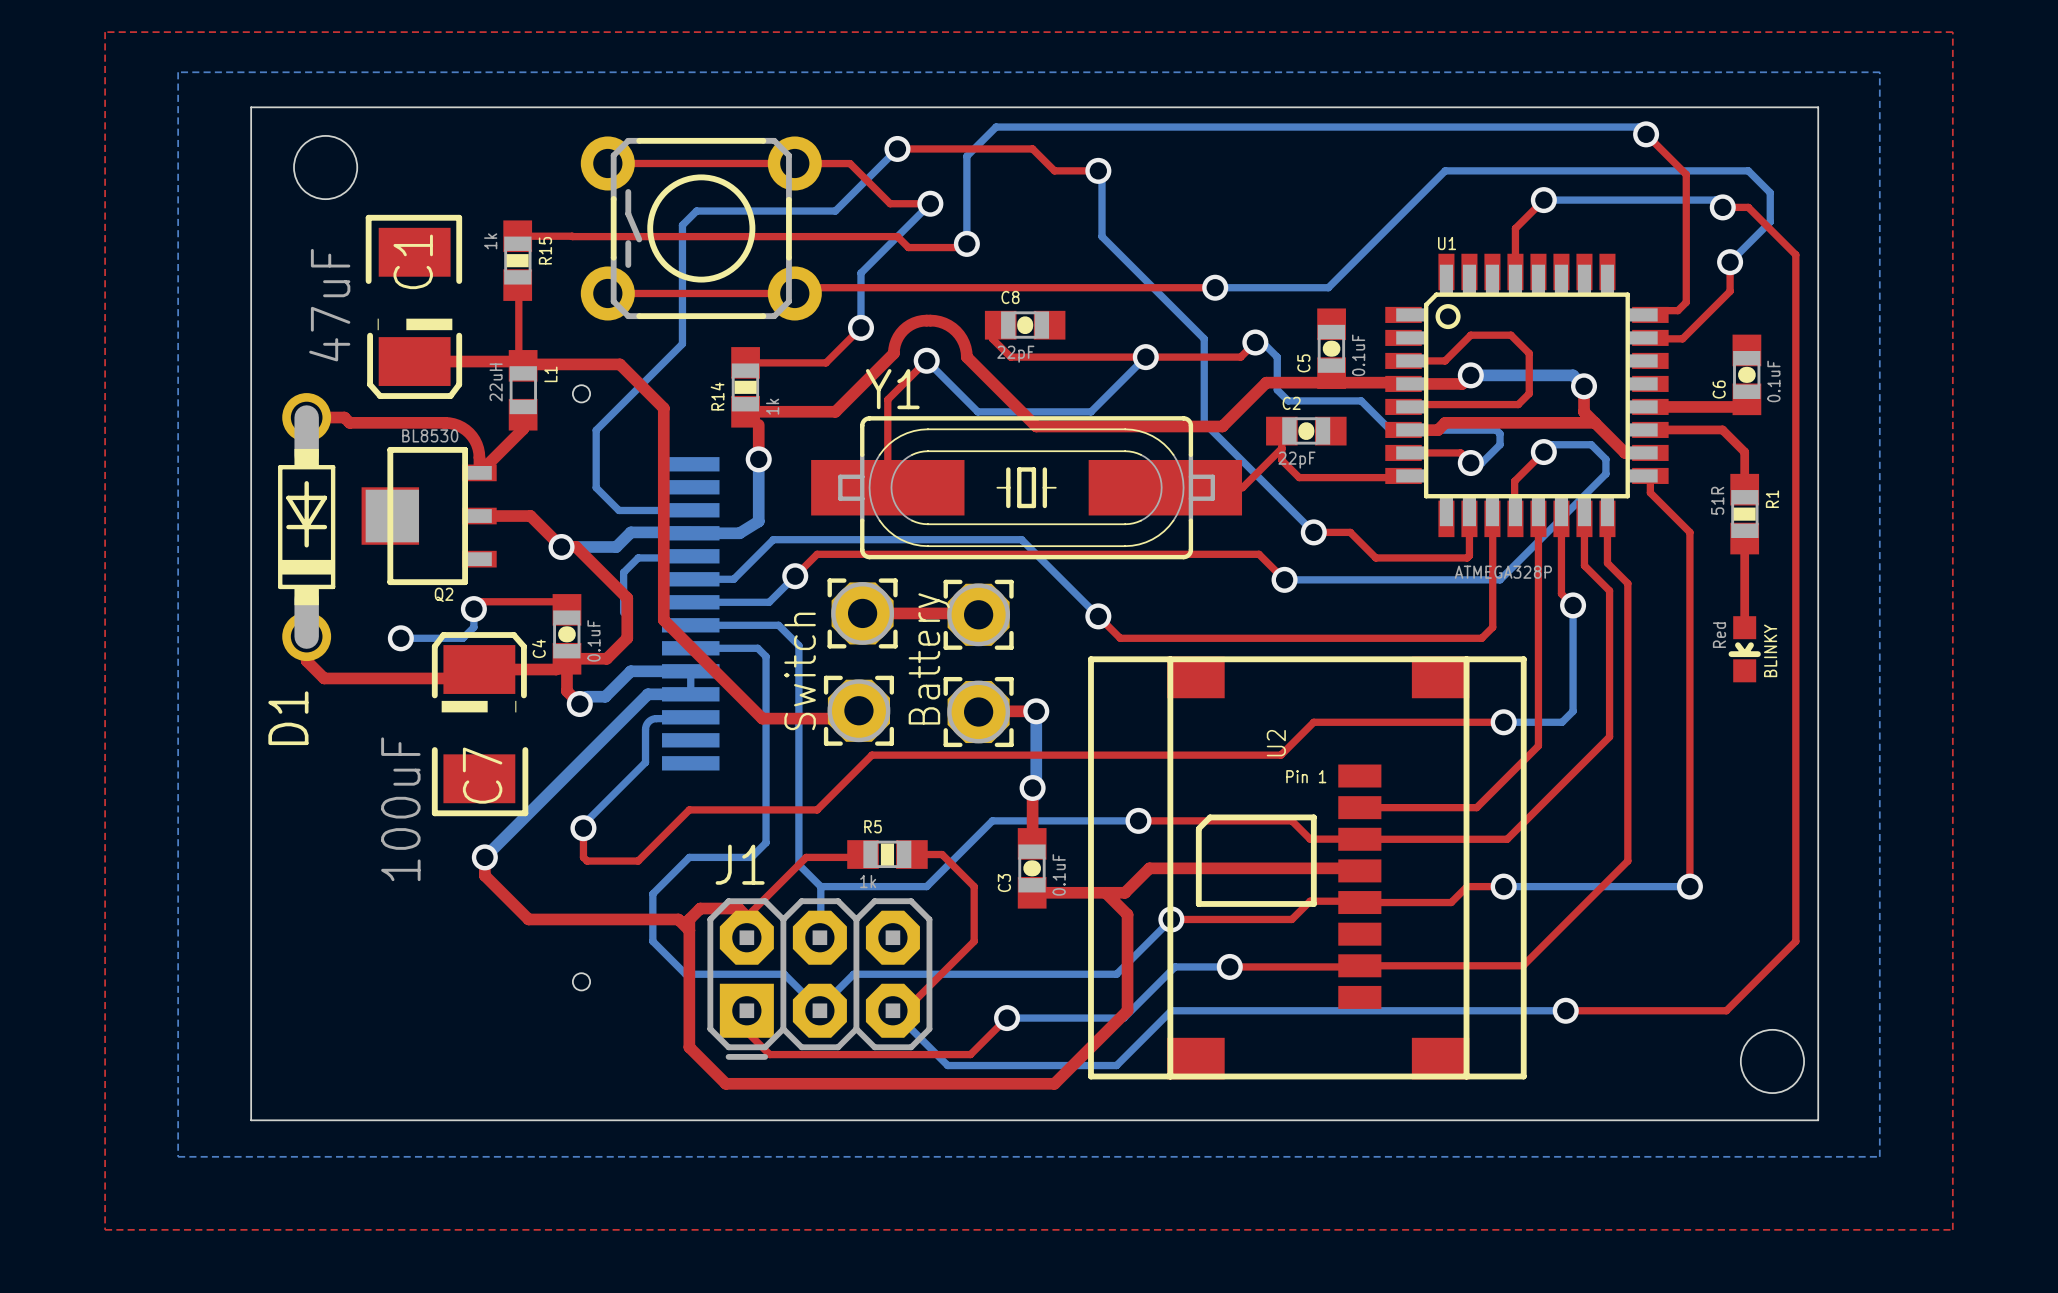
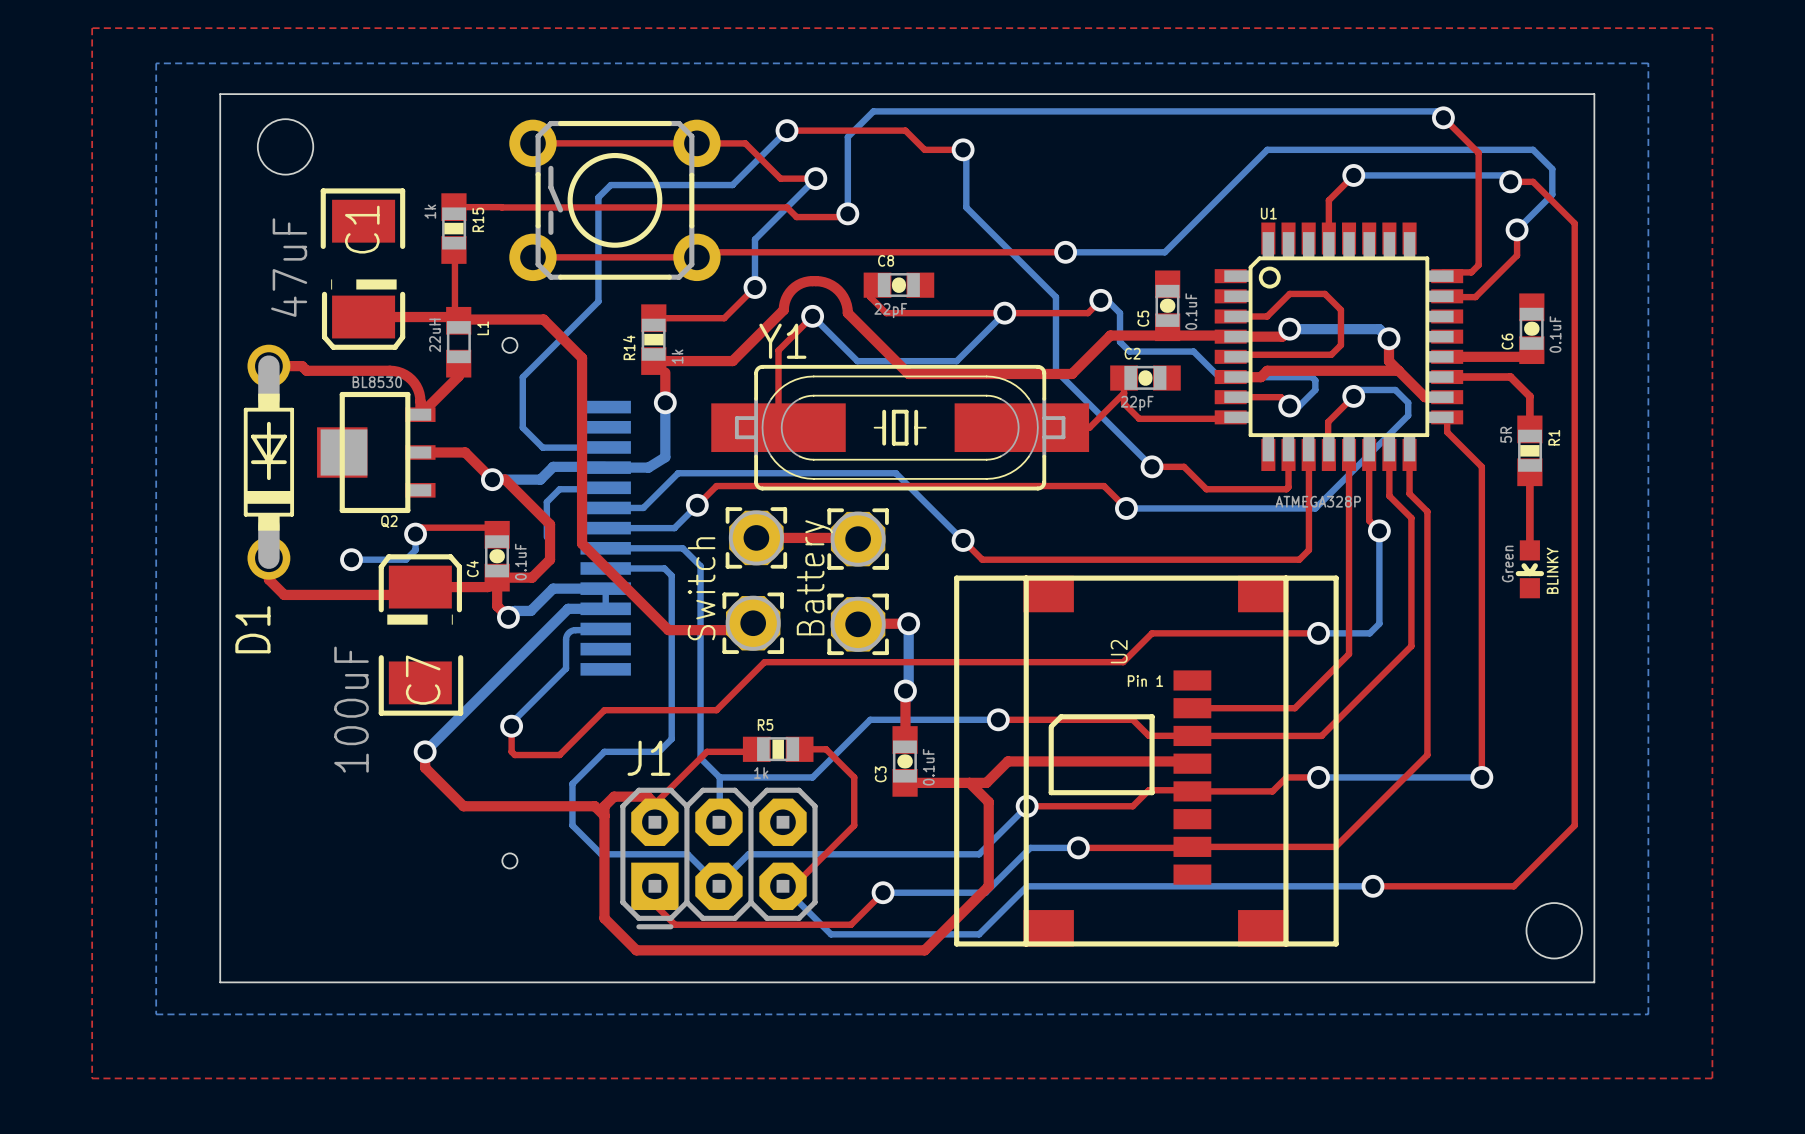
R1 value: 51R (1717, 500) -> 5R (1506, 434)
BLINKY value: Red (1719, 635) -> Green (1507, 563)

